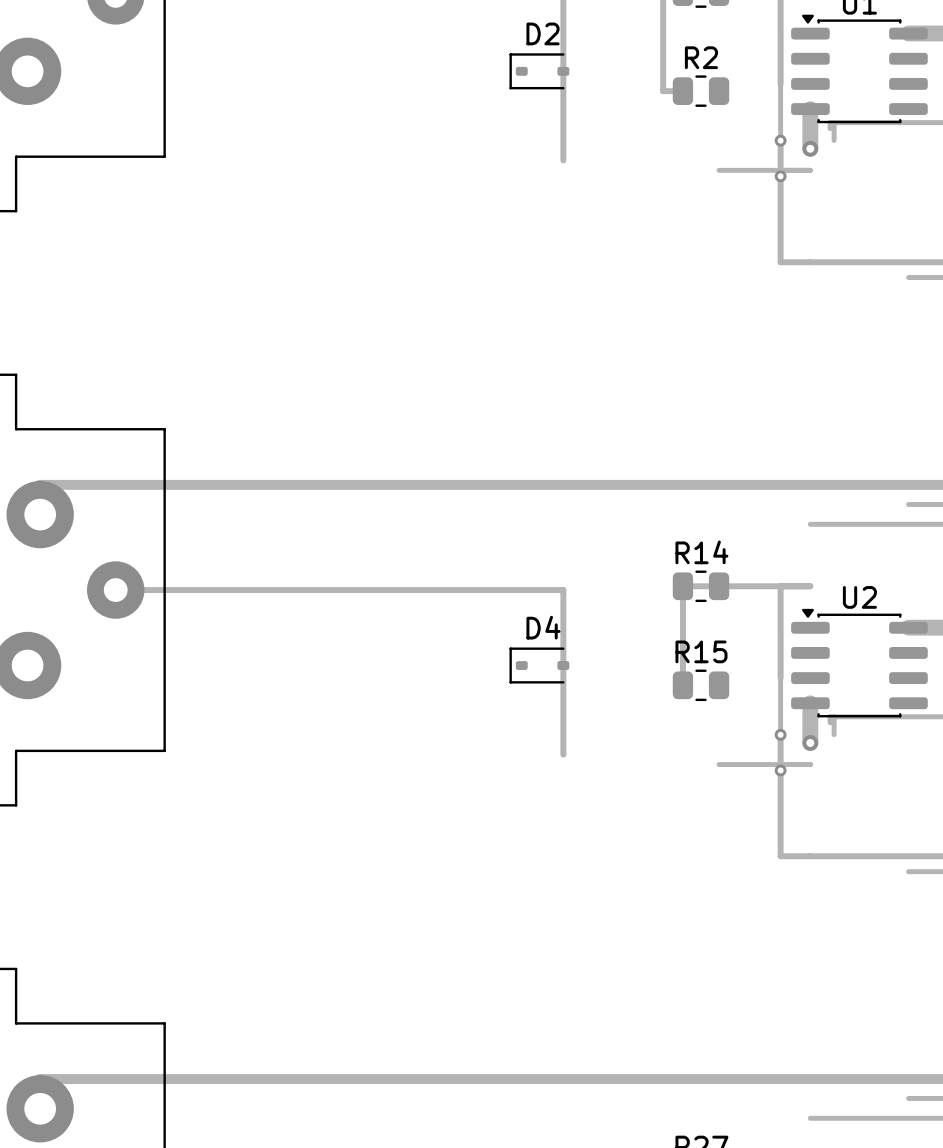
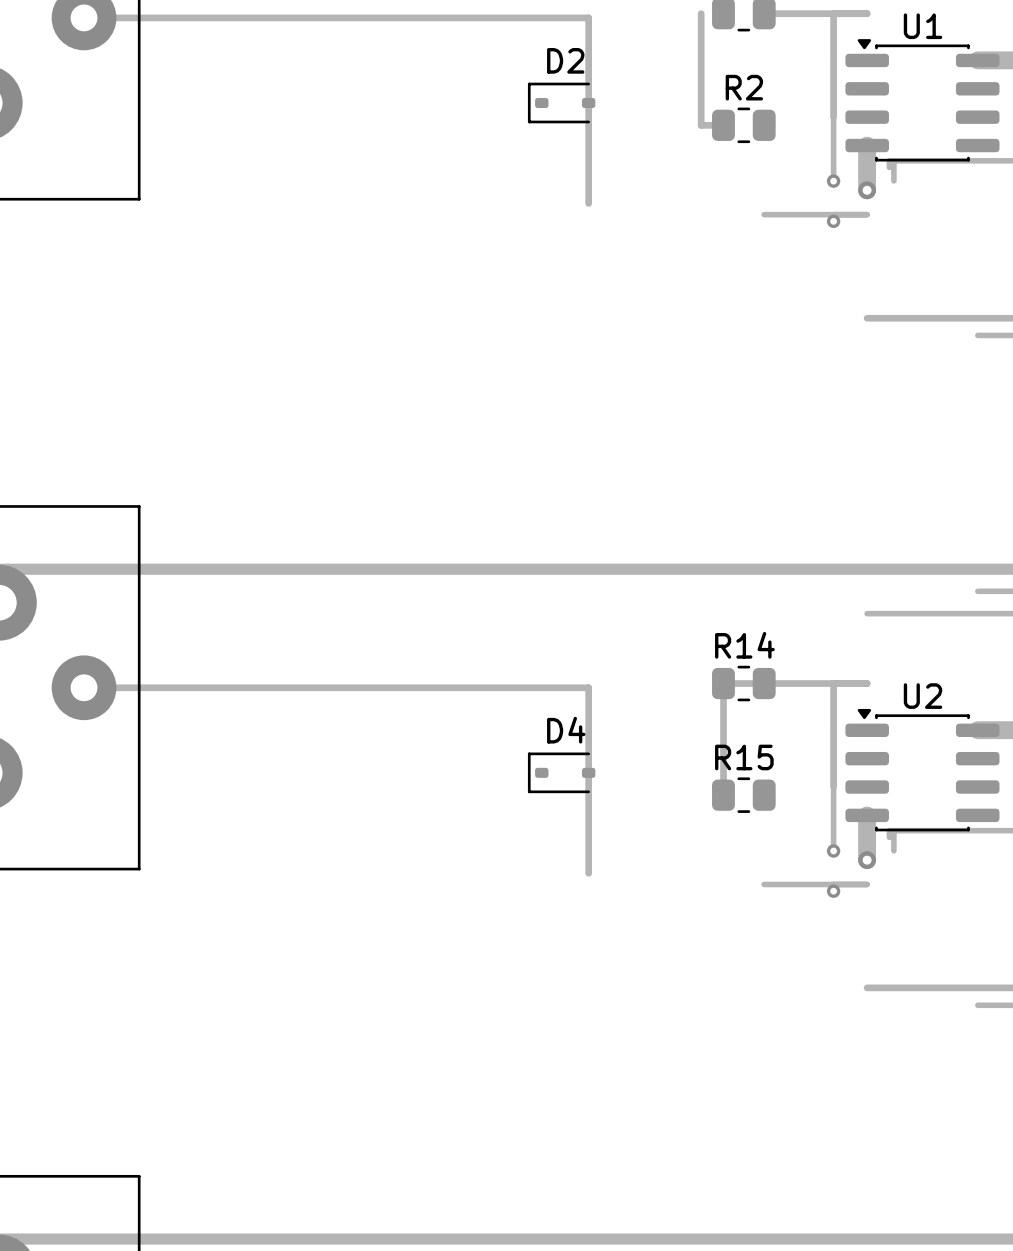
track: (780, 140) (780, 262) (810, 262) -> none
track: (780, 734) (780, 856) (810, 856) -> none

